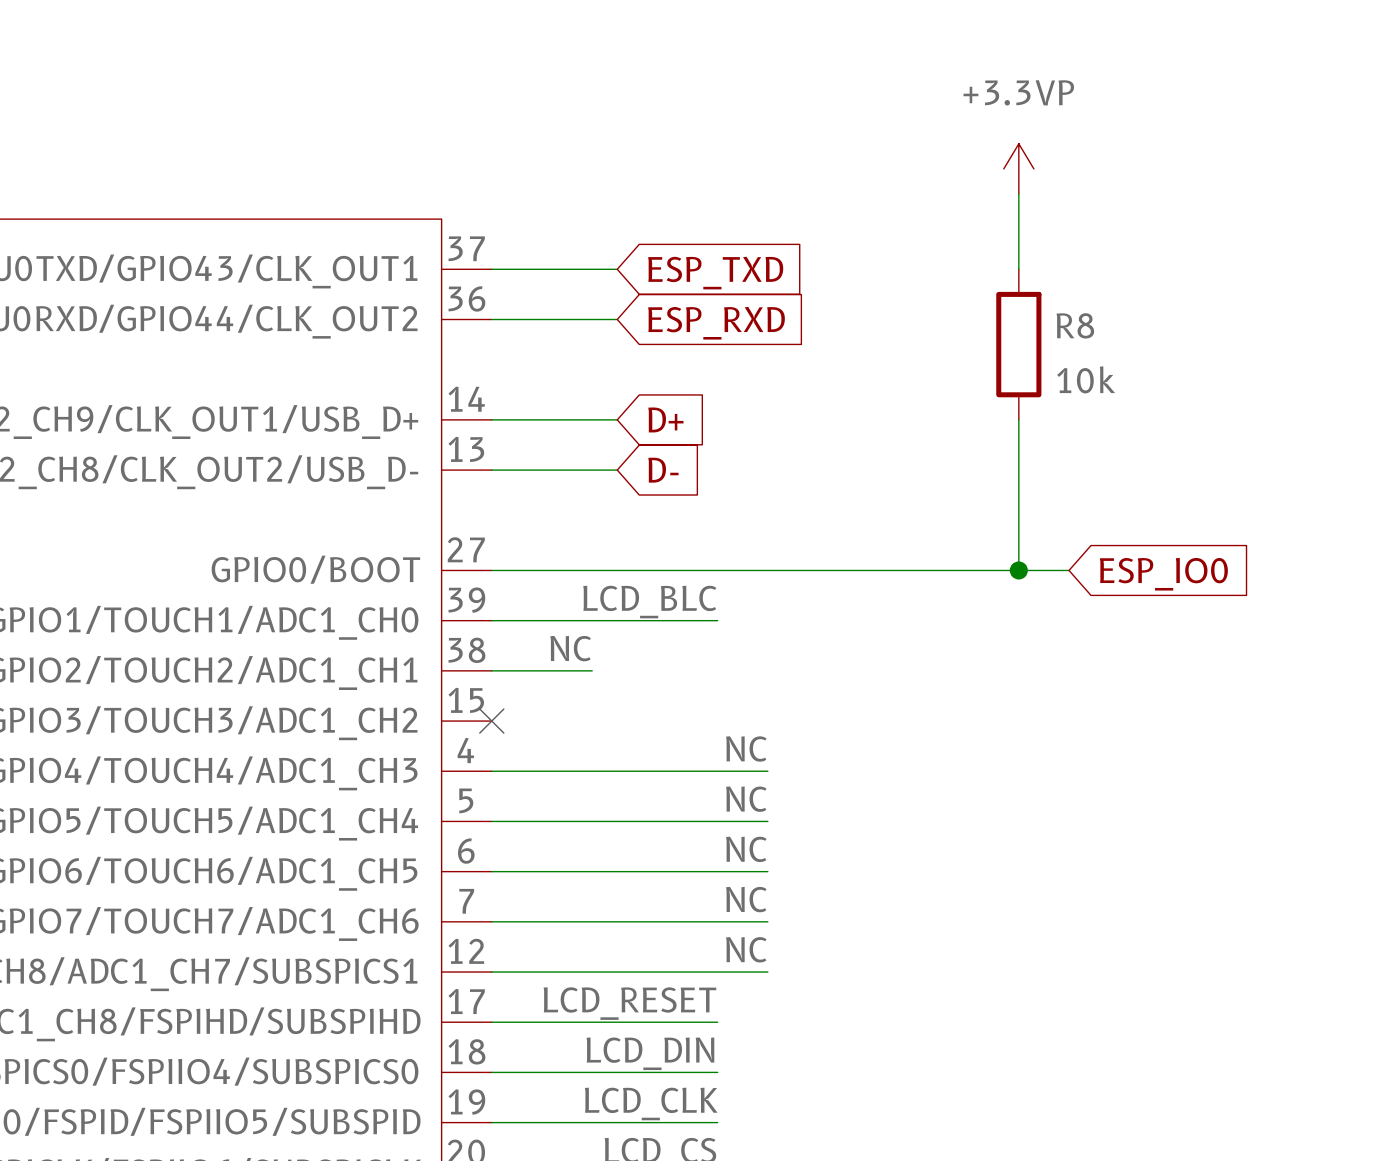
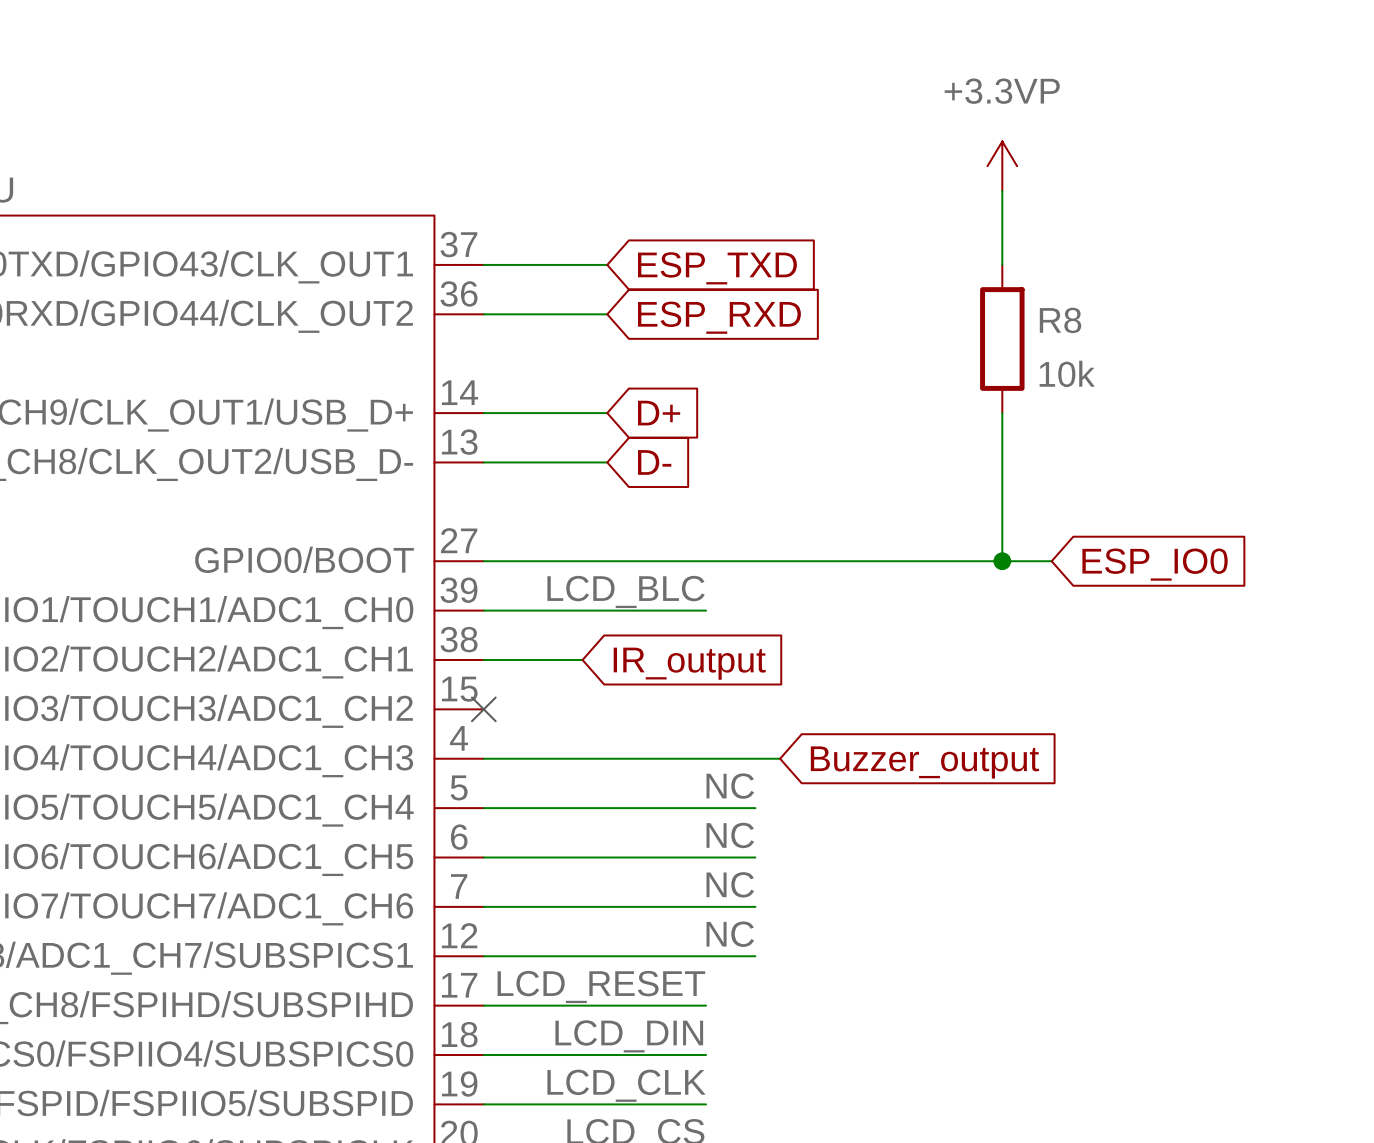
label: NC (570, 648) -> none
global label: none -> IR_output (689, 663)
label: NC (746, 748) -> none
wire: none -> (755, 758) (780, 758)
global label: none -> Buzzer_output (924, 762)

